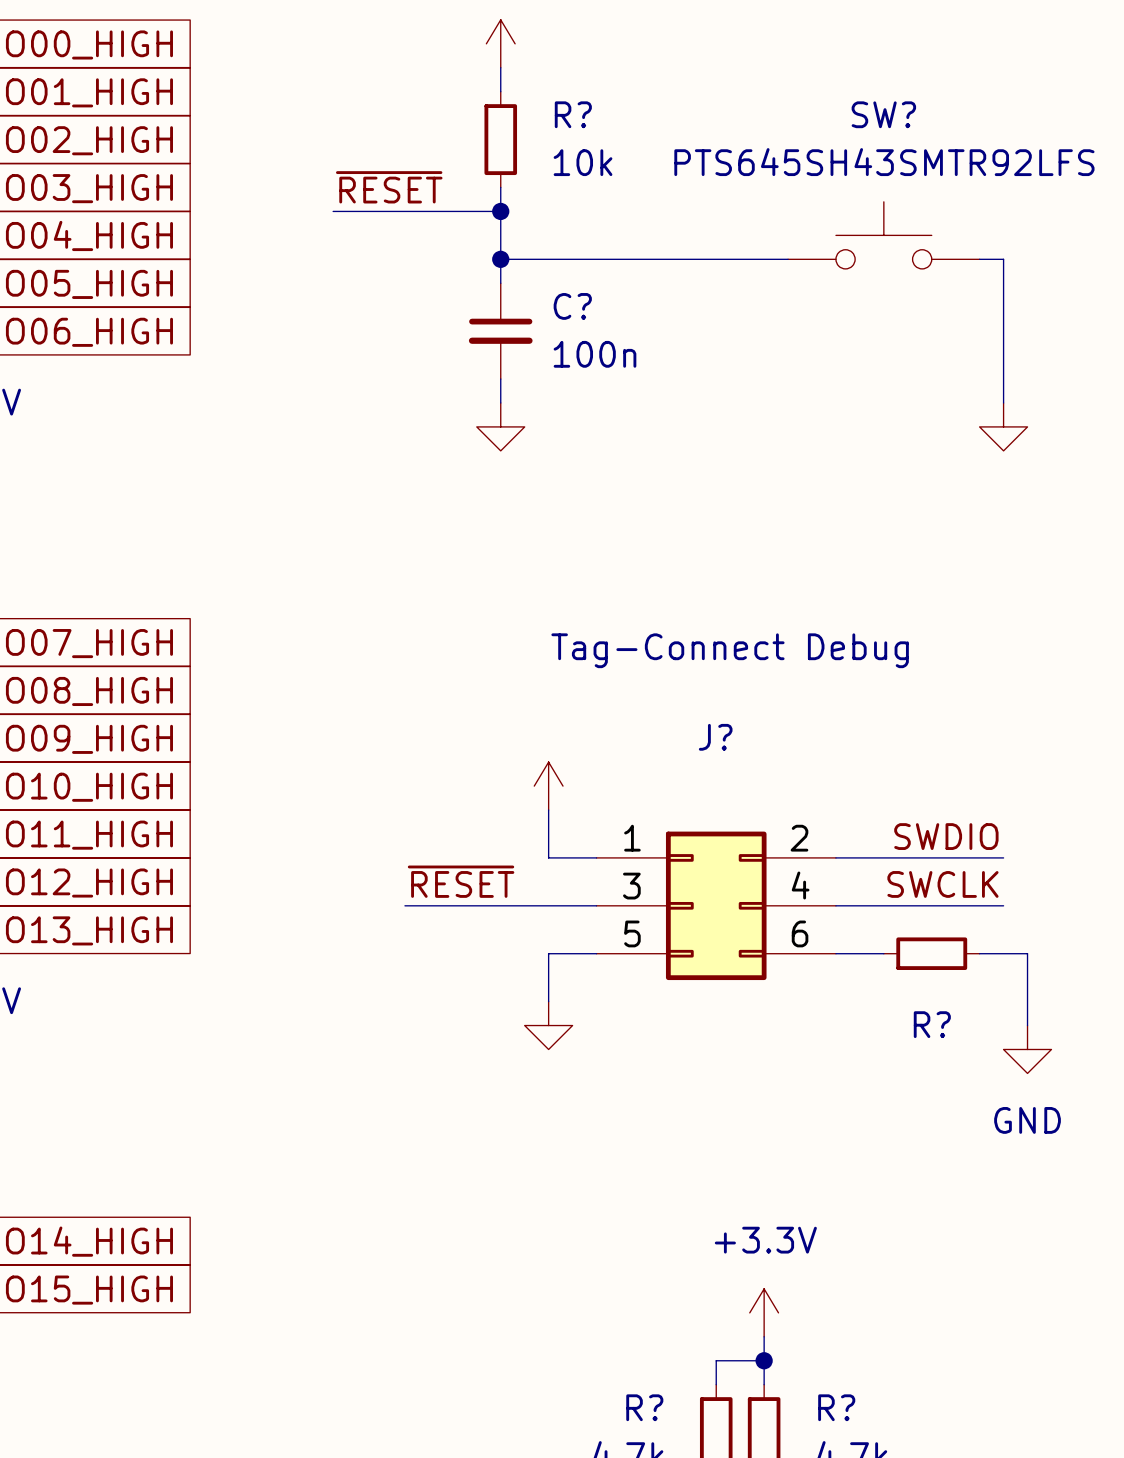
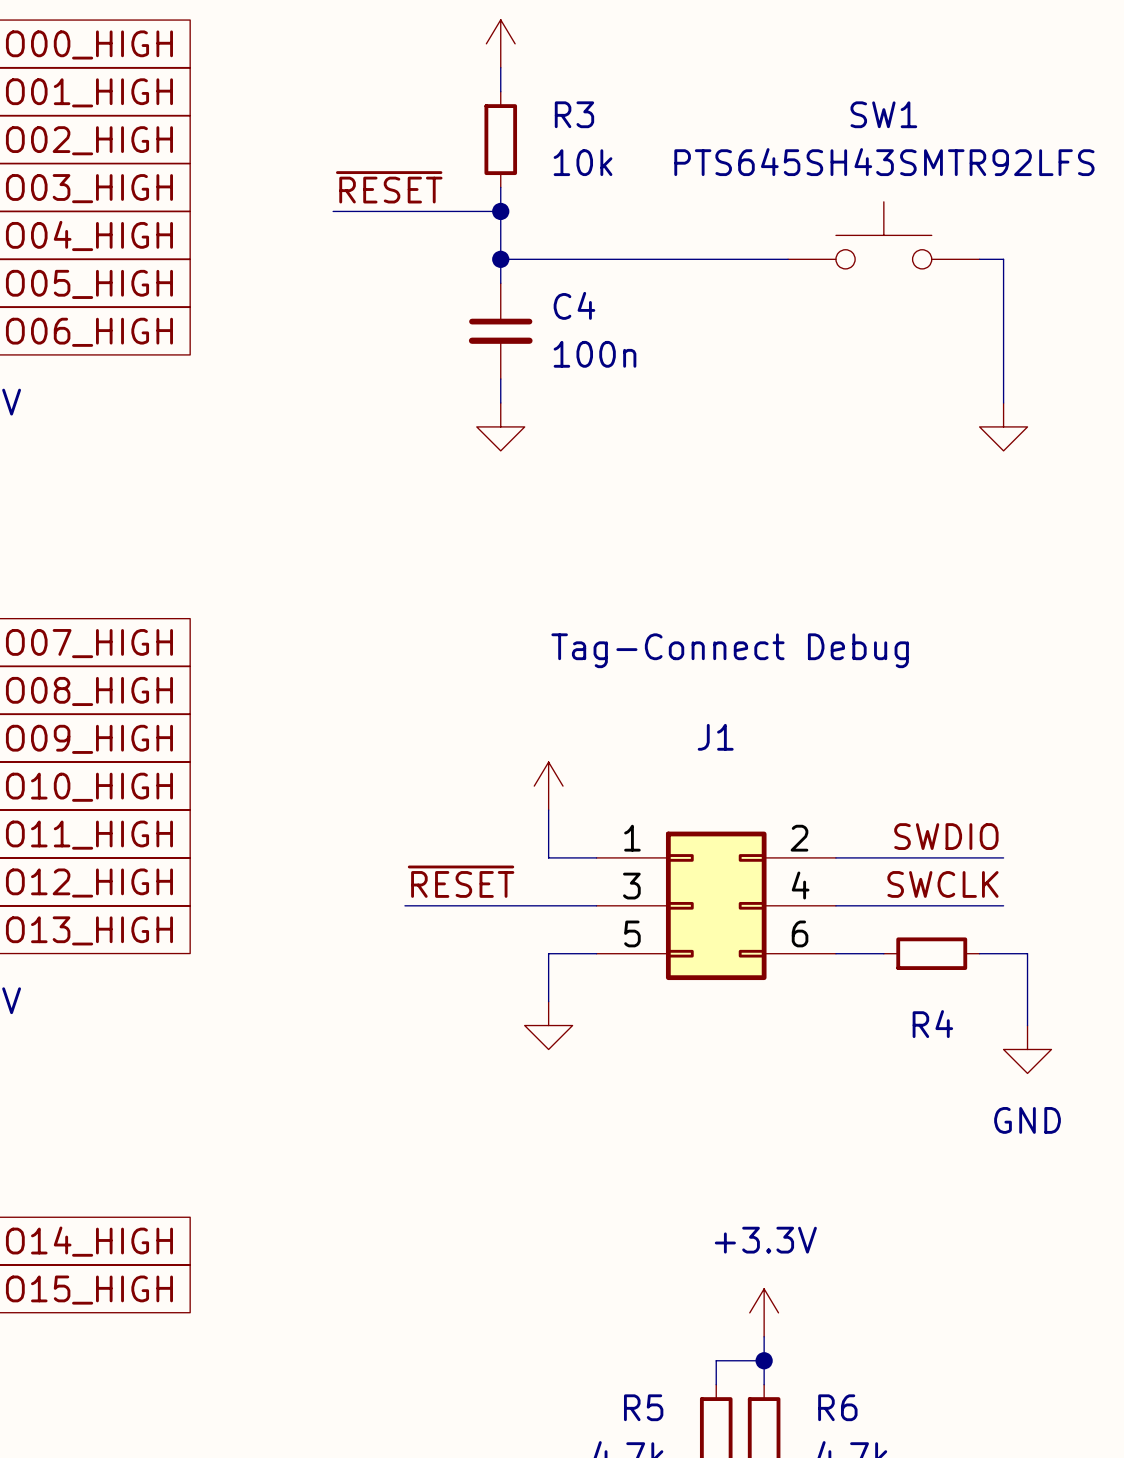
R? name: R? (573, 114) -> R3 (574, 114)
SW? name: SW? (883, 114) -> SW1 (883, 114)
C? name: C? (572, 306) -> C4 (574, 305)
J? name: J? (715, 737) -> J1 (715, 737)
R? name: R? (932, 1024) -> R4 (932, 1024)
R? name: R? (644, 1407) -> R5 (643, 1407)
R? name: R? (836, 1407) -> R6 (837, 1407)

